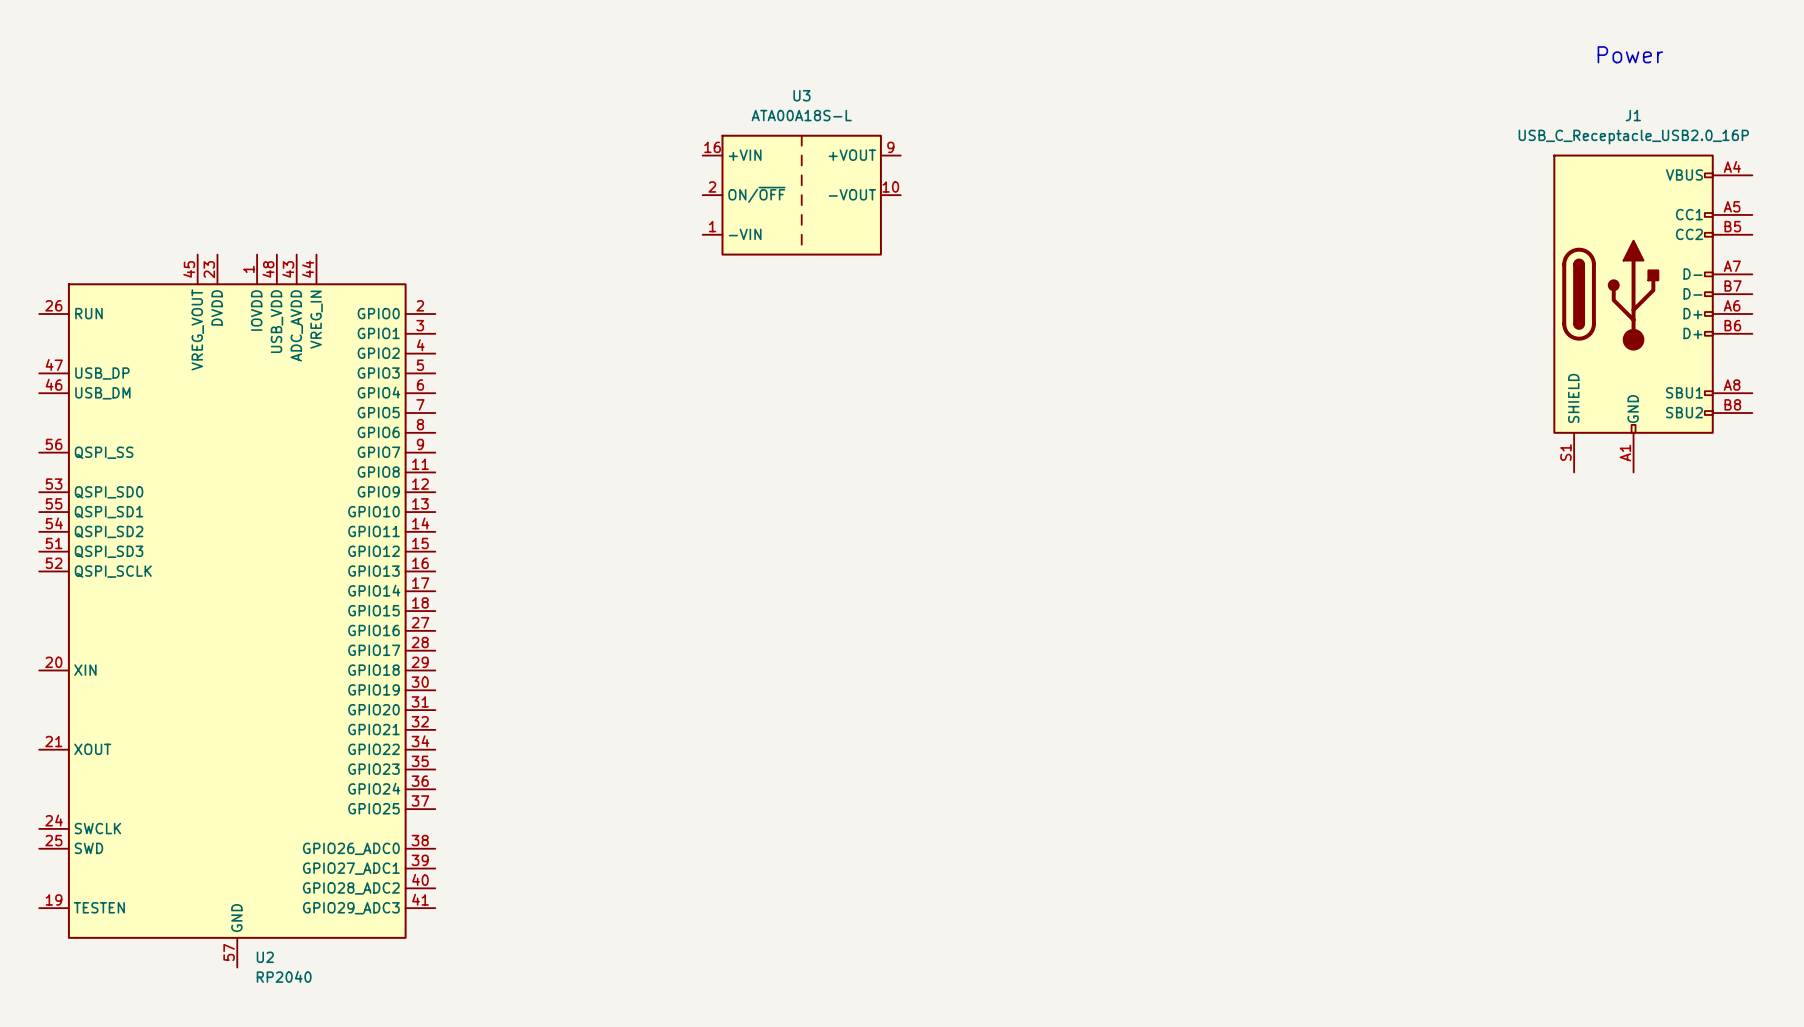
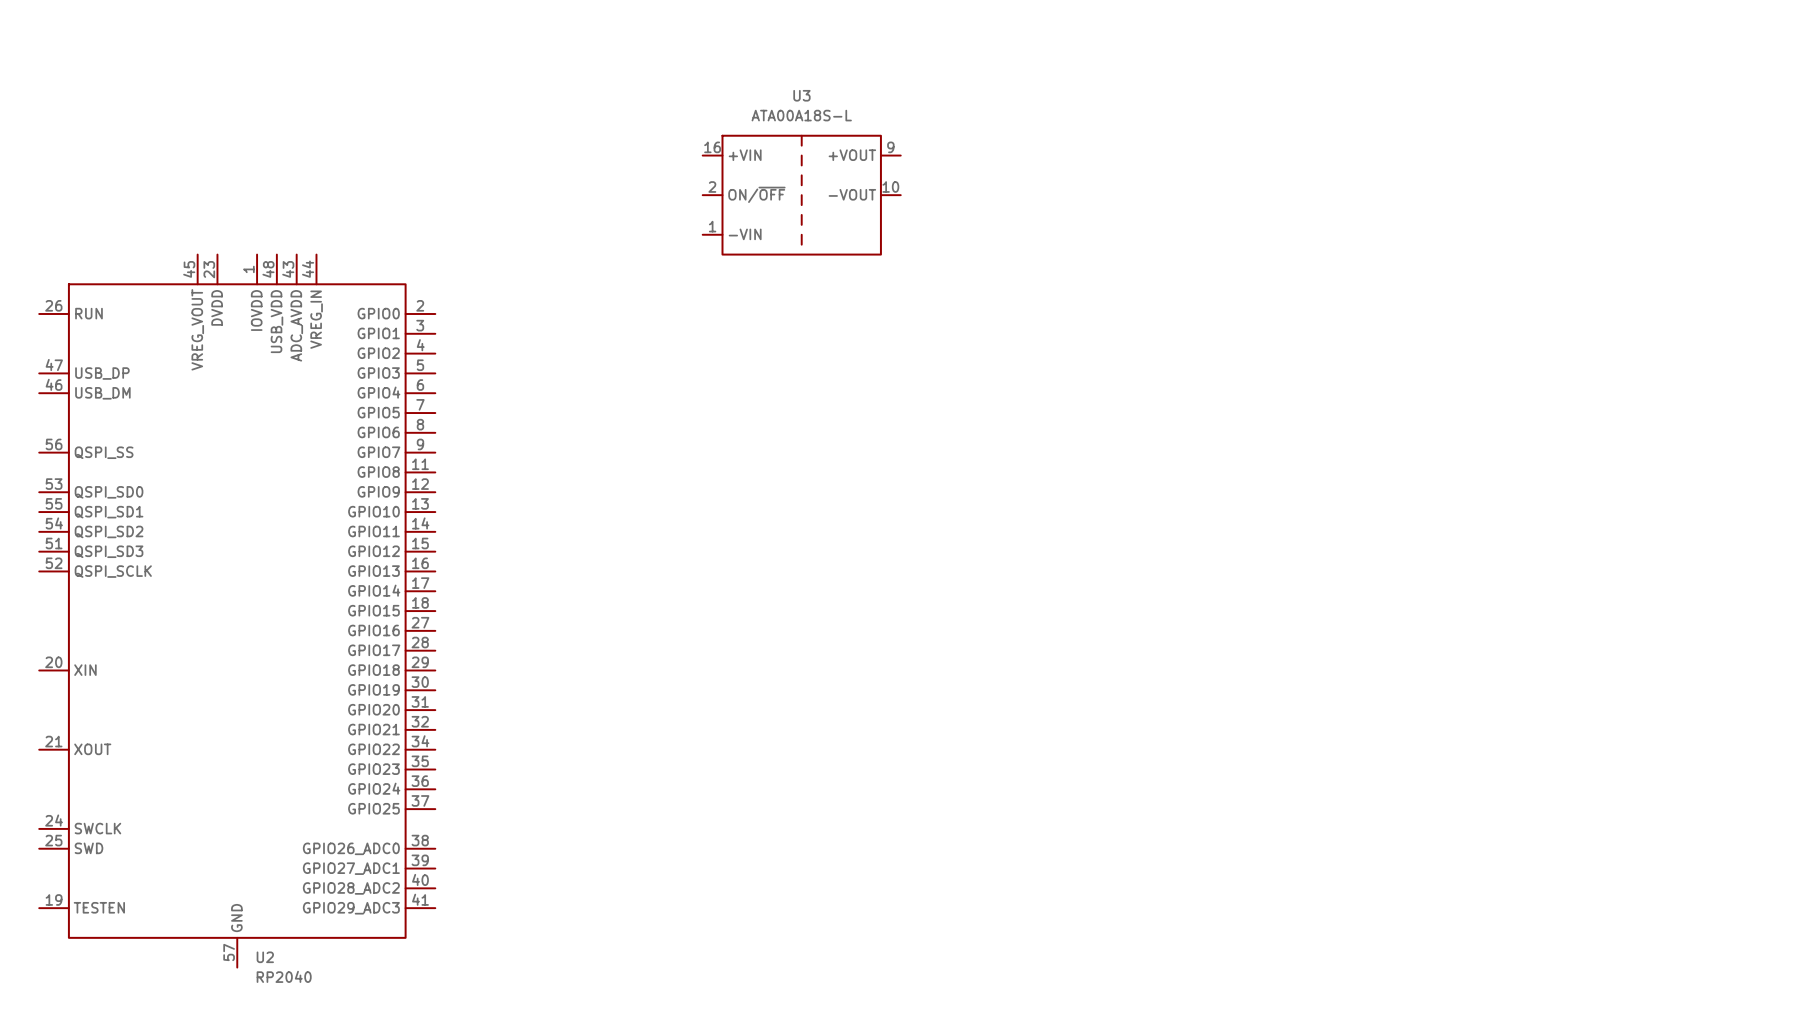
text: Power (1630, 54) -> none
J1: USB_C_Receptacle_USB2.0_16P (1652, 313) -> none

